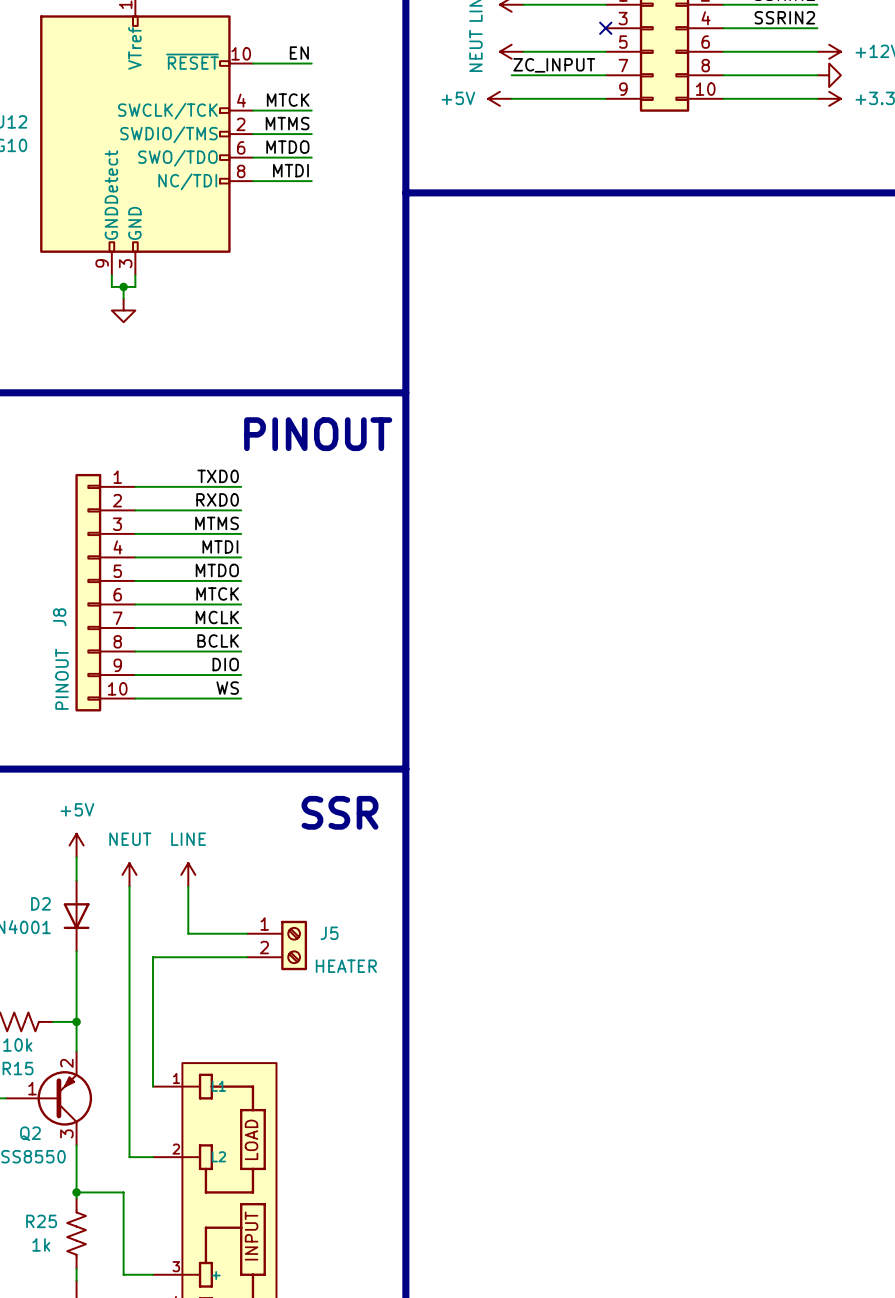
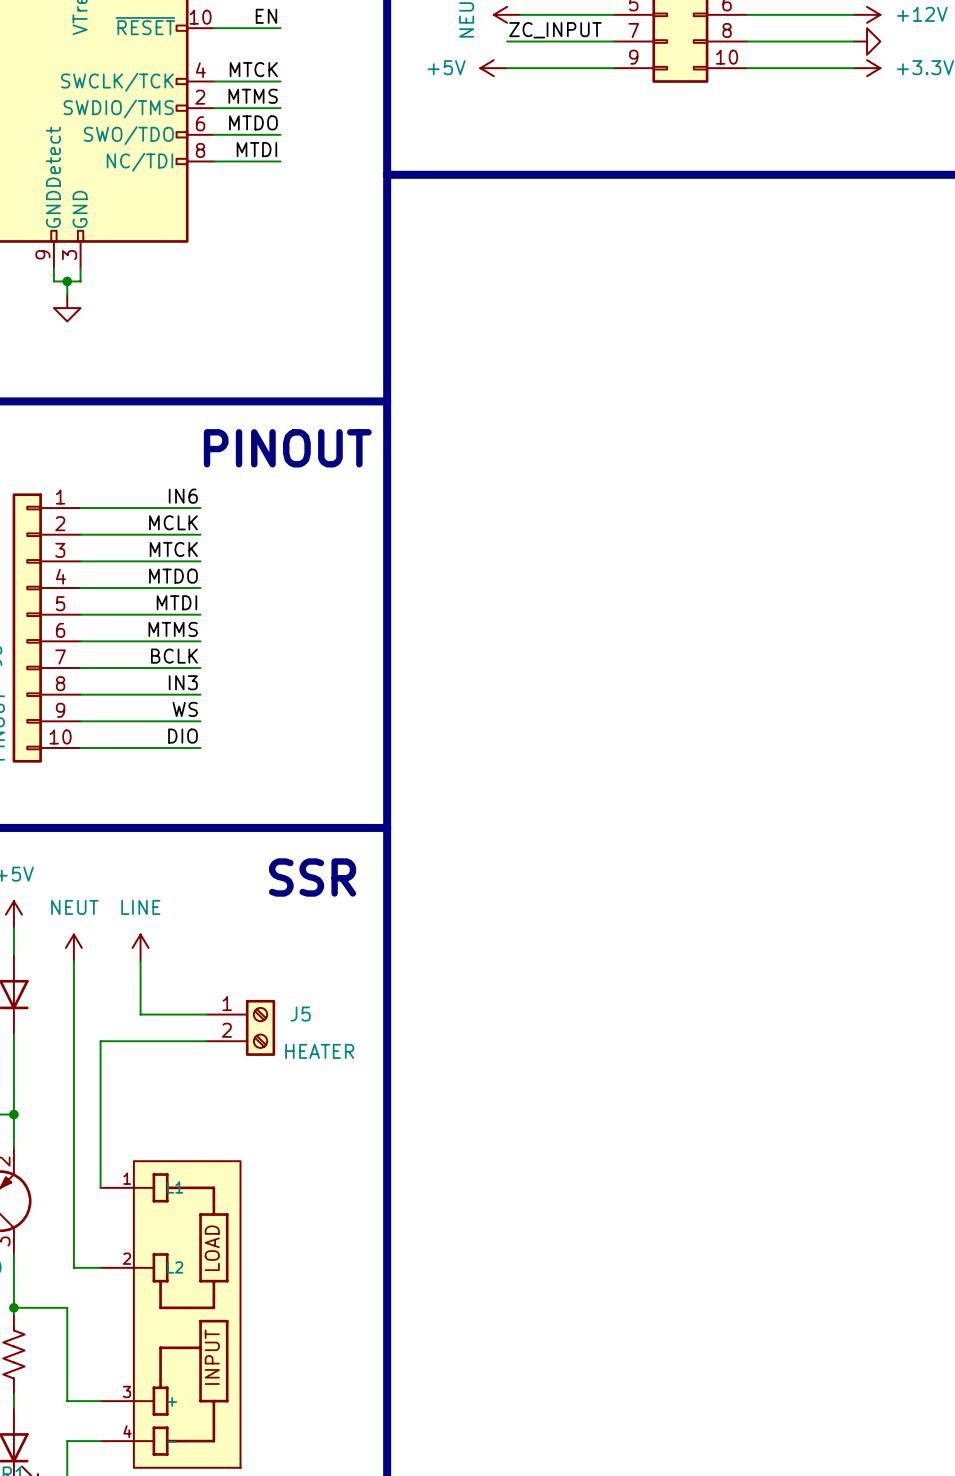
label: TXD0 (218, 476) -> IN6 (183, 496)
label: RXD0 (217, 499) -> MCLK (173, 522)
label: MTMS (217, 523) -> MTCK (173, 549)
label: MTDI (220, 546) -> MTDO (173, 576)
label: MTDO (217, 570) -> MTDI (176, 602)
label: MTCK (217, 593) -> MTMS (173, 629)
label: MCLK (217, 617) -> BCLK (174, 656)
label: BCLK (218, 641) -> IN3 (183, 682)
label: DIO (225, 664) -> WS (185, 709)
label: WS (227, 688) -> DIO (182, 736)

